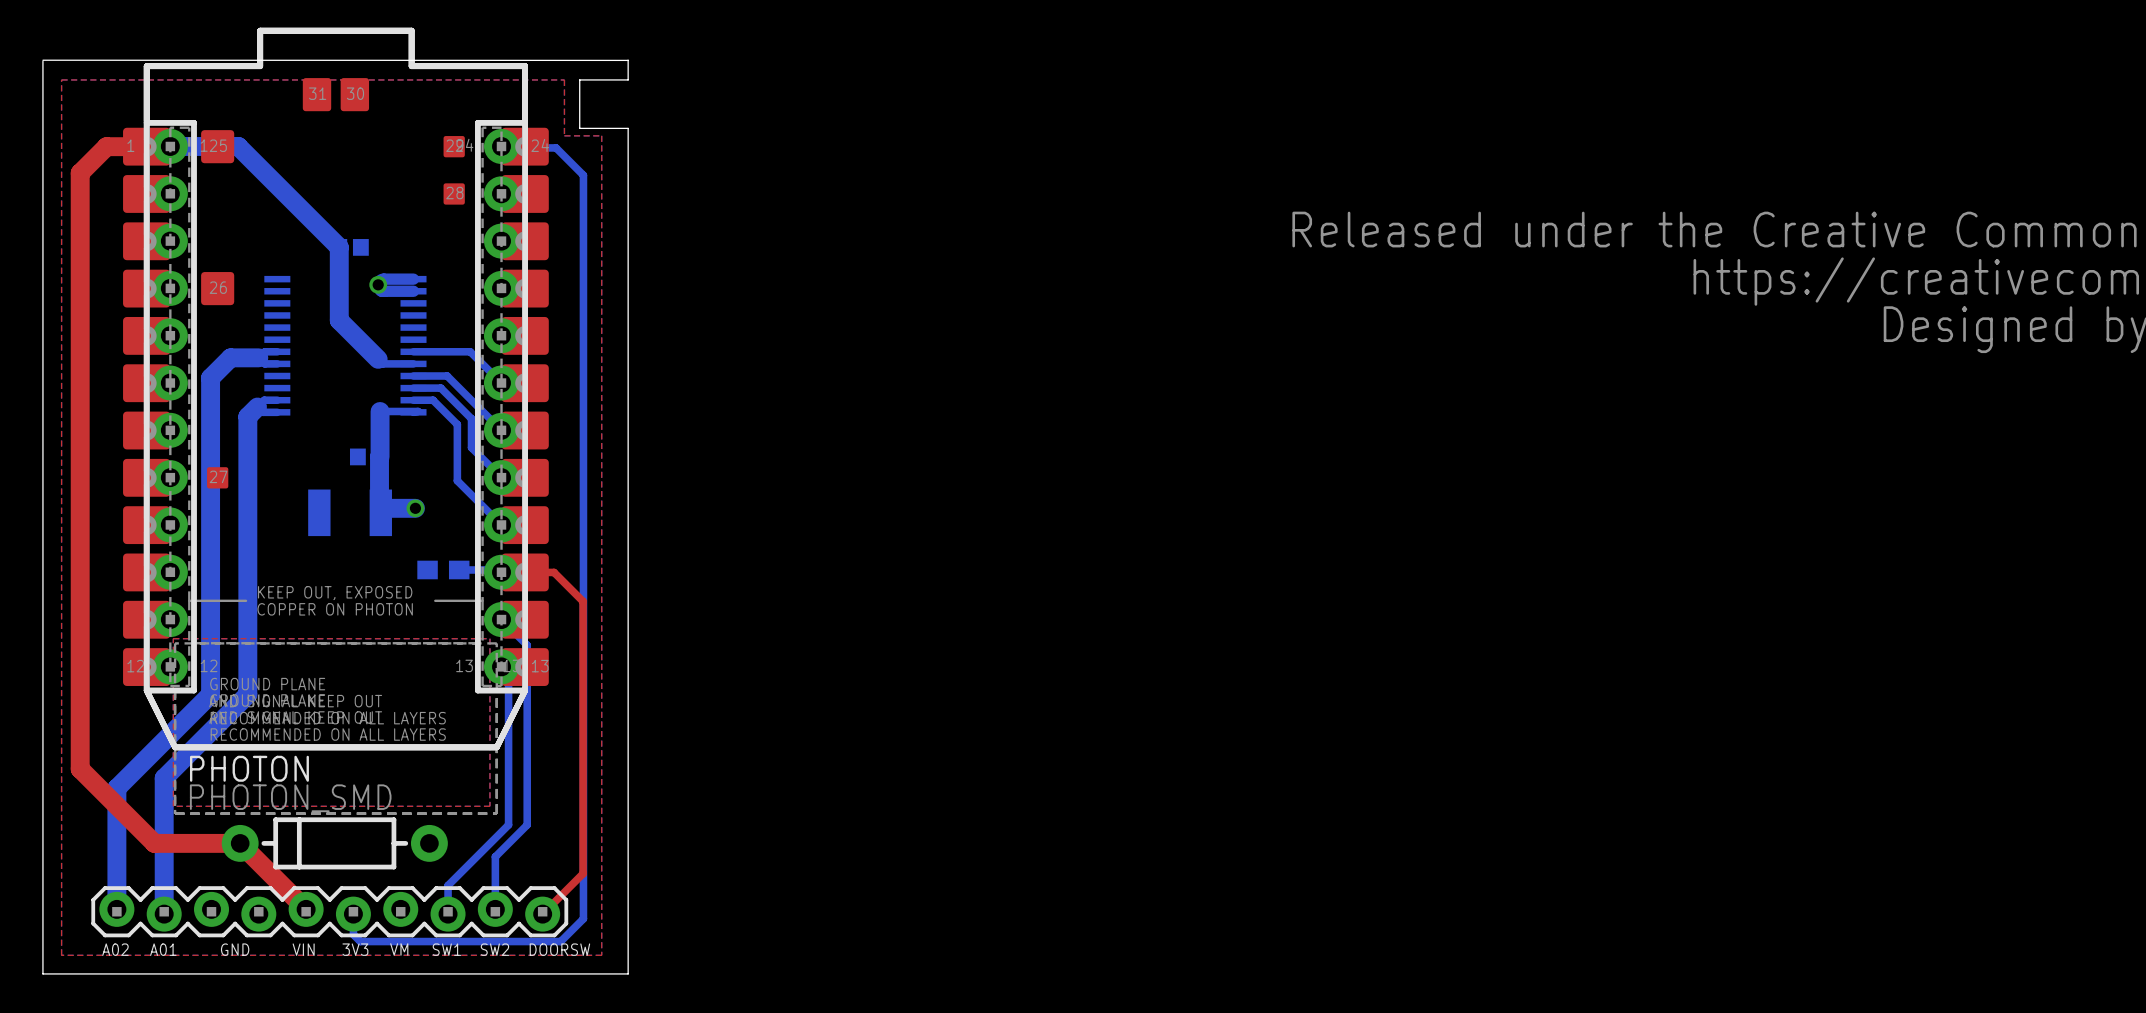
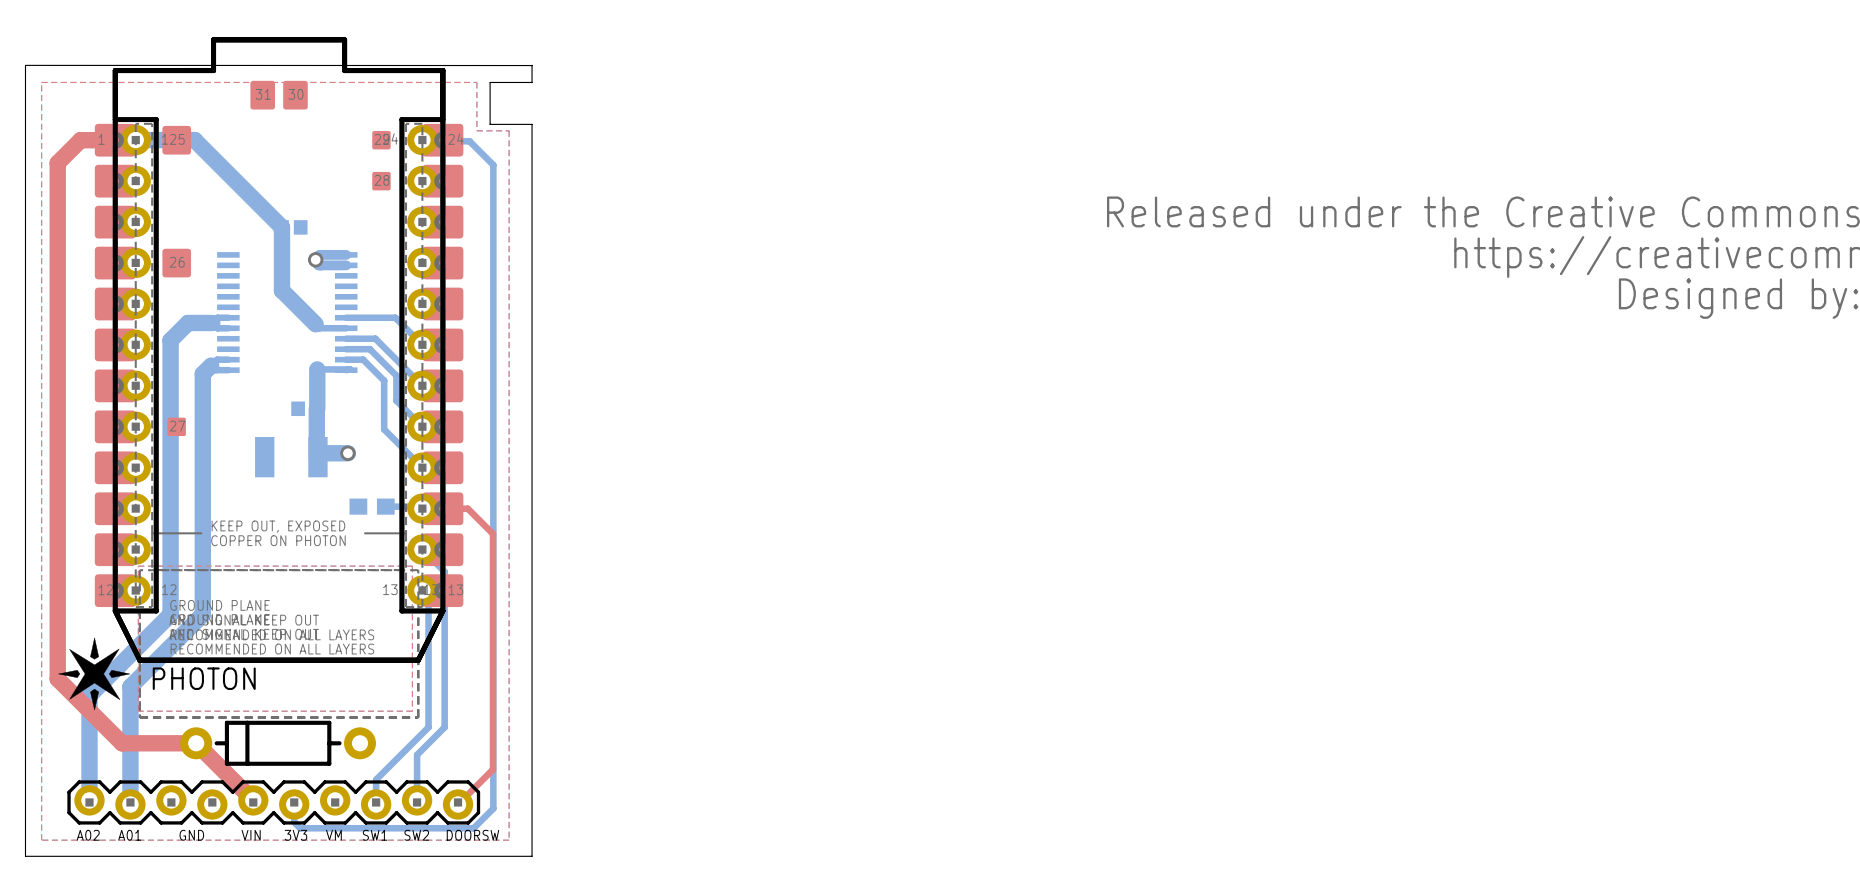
drawing: none -> [58, 637, 131, 711]
PHOTON value: PHOTON_SMD (290, 798) -> none

